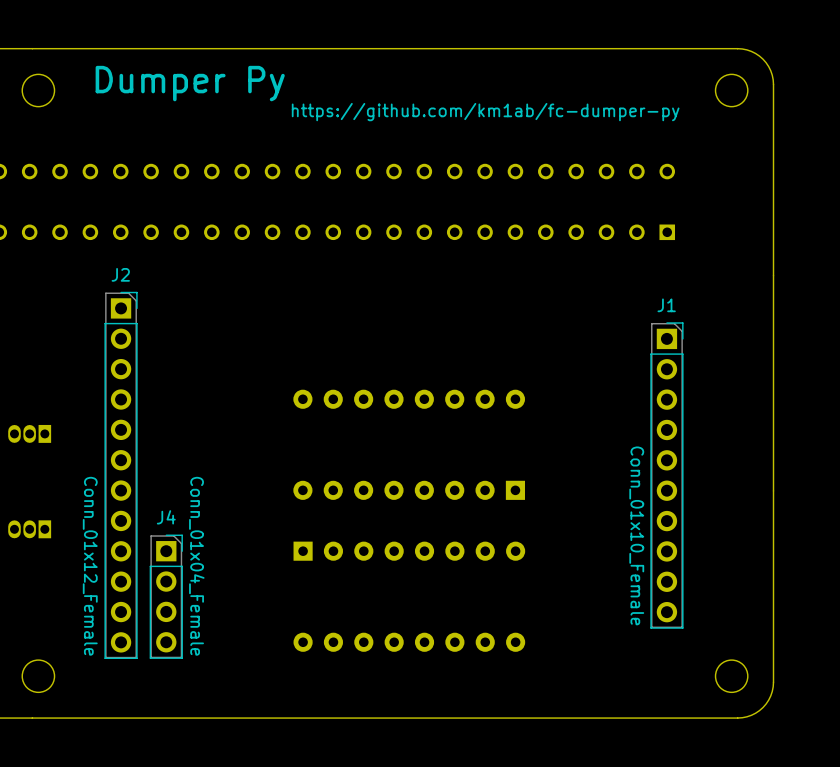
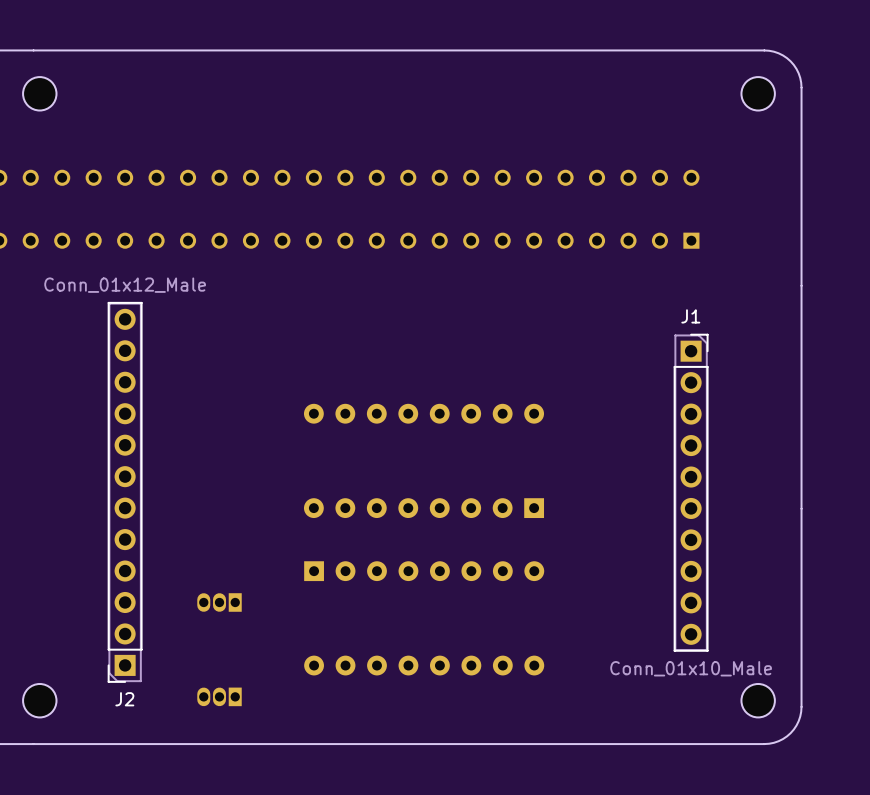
text: Dumper Py (190, 83) -> none
text: https://github.com/km1ab/fc-dumper-py (485, 112) -> none
part: (29, 433) -> none
J2 rotation: 0° (121, 475) -> 180° (125, 492)
part: (29, 529) -> none
J1 value: Conn_01x10_Female (636, 535) -> Conn_01x10_Male (691, 668)
J2 value: Conn_01x12_Female (90, 566) -> Conn_01x12_Male (125, 285)
part: none -> (219, 602)
J4: Conn_01x04_Female (166, 596) -> none
part: none -> (219, 696)

